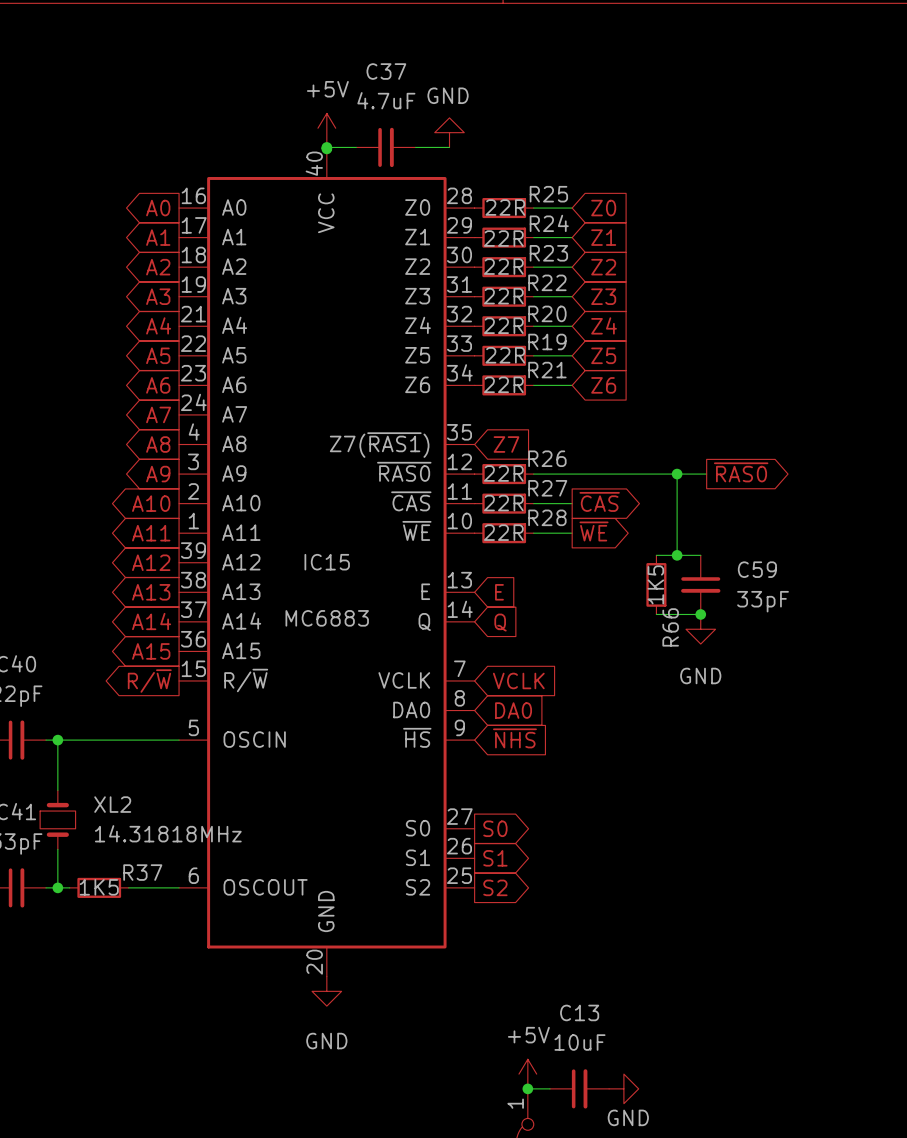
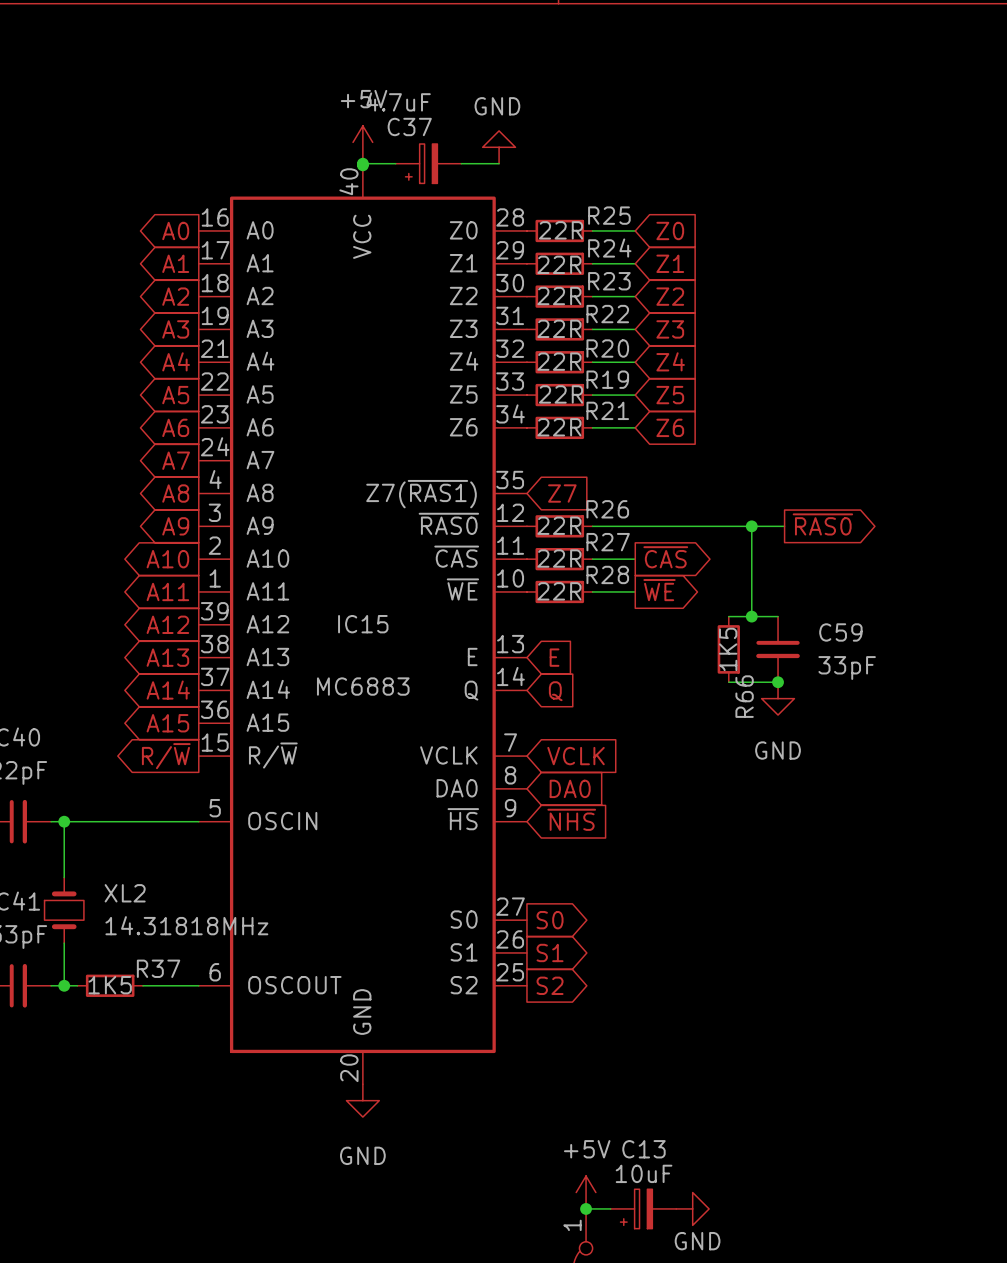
C37 name position: C37 (386, 71) -> C37 (409, 126)
C37 symbol: [356, 127, 416, 168] -> [395, 144, 462, 184]
C13 symbol: [550, 1069, 610, 1109] -> [610, 1189, 677, 1229]

